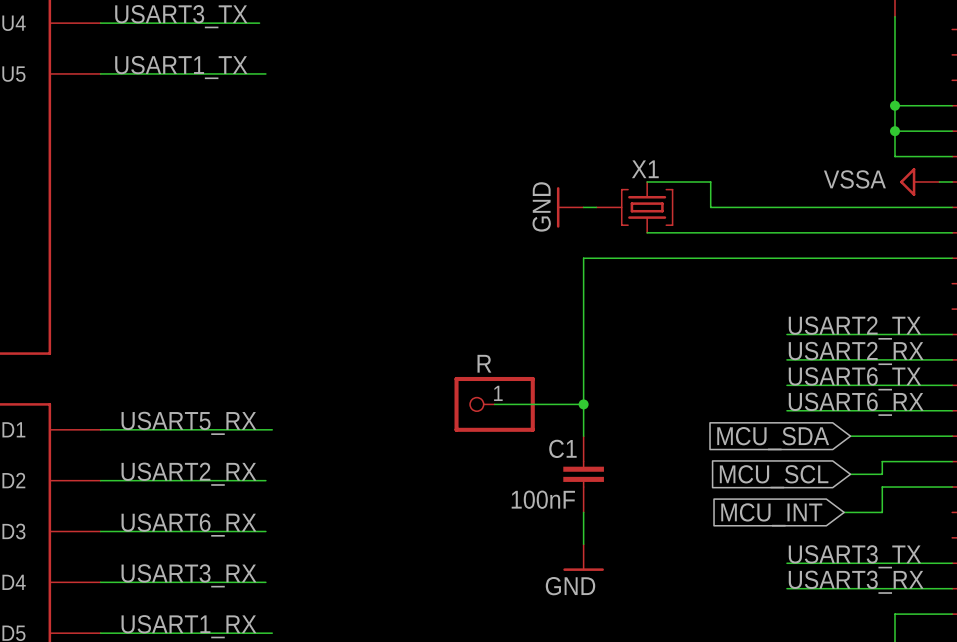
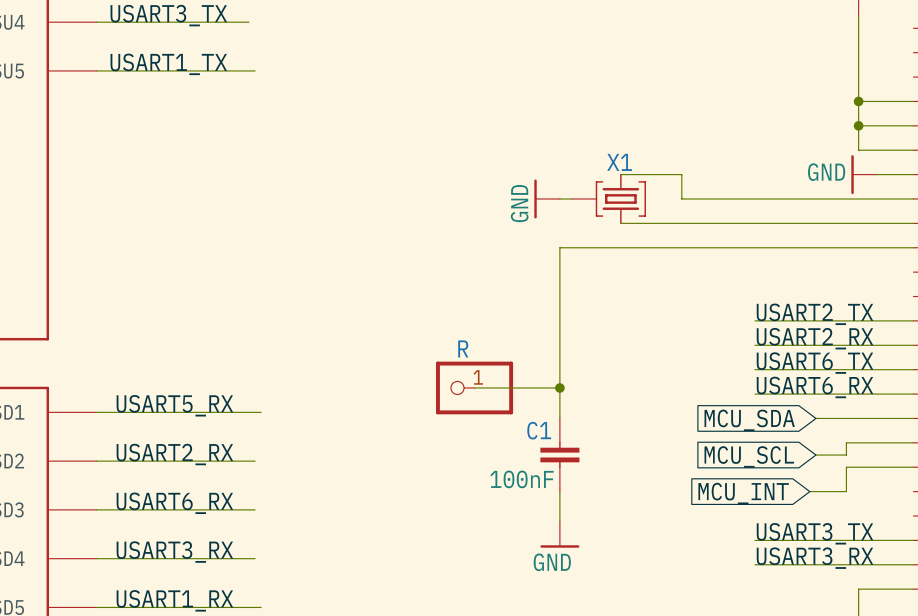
power symbol: none -> GND (864, 174)
power symbol: VSSA (919, 181) -> none

